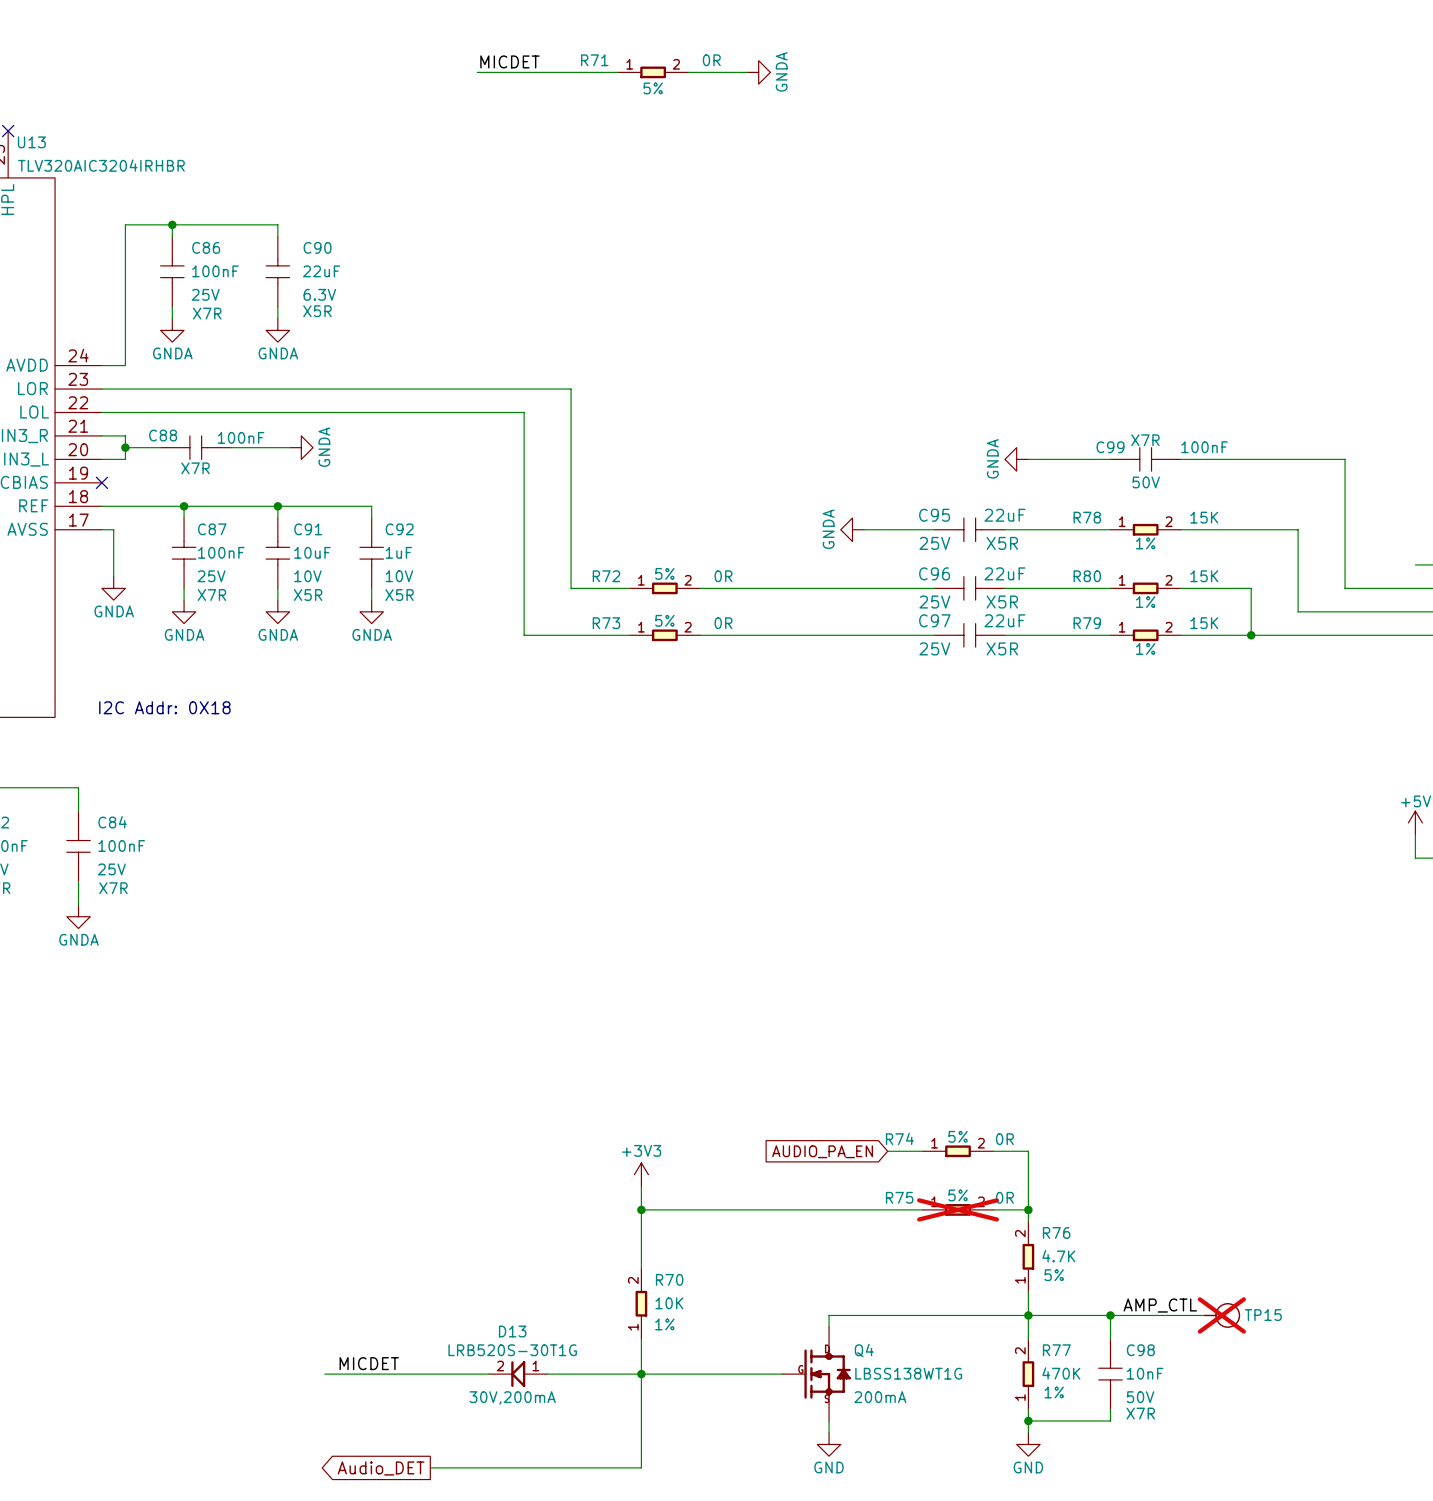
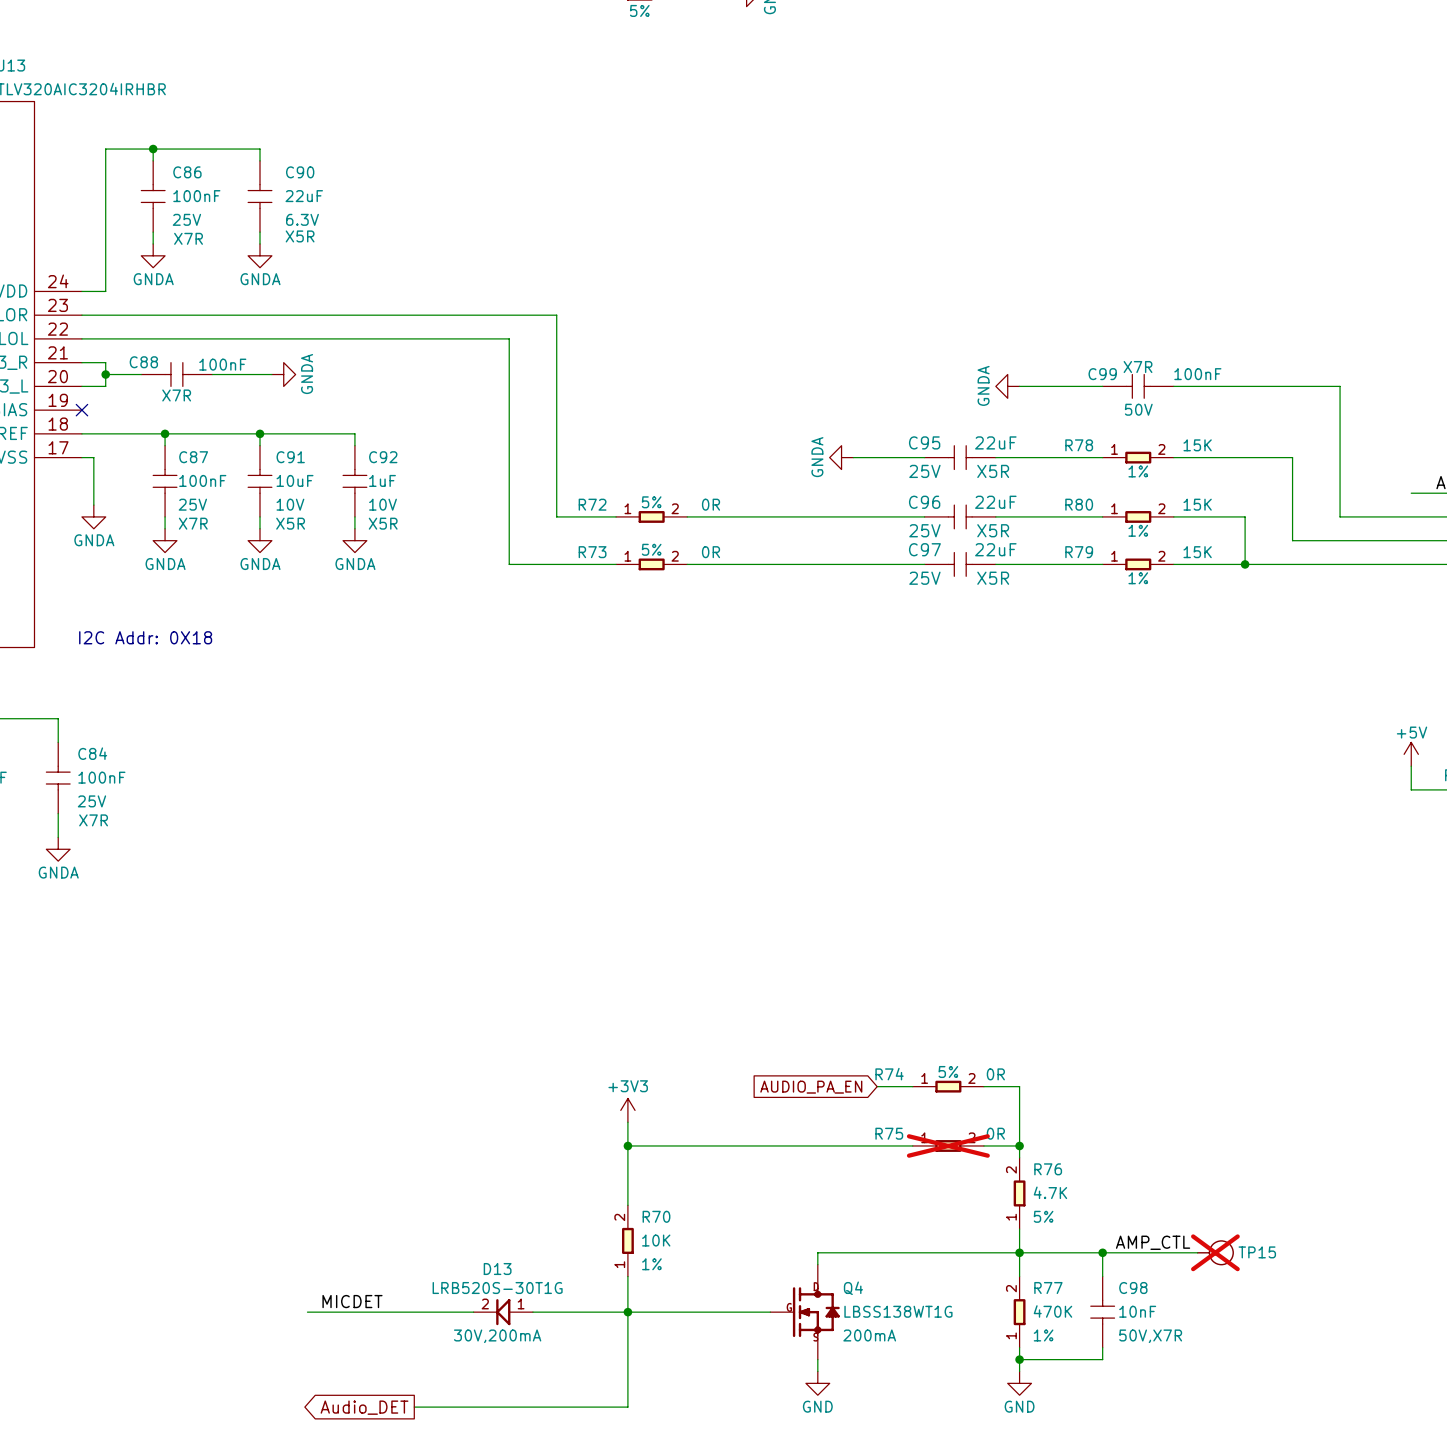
R75 text: 5% (958, 1195) -> none
R76 text: 5% (1054, 1275) -> none
R76 text: none -> 5% (1043, 1216)
R70 text: 1% (664, 1324) -> none
R70 text: none -> 1% (651, 1264)
R77 text: 1% (1054, 1392) -> none
R77 text: none -> 1% (1043, 1335)
C98 text: 50V (1140, 1397) -> 50V,X7R (1150, 1336)
C98 text: X7R (1140, 1413) -> none

